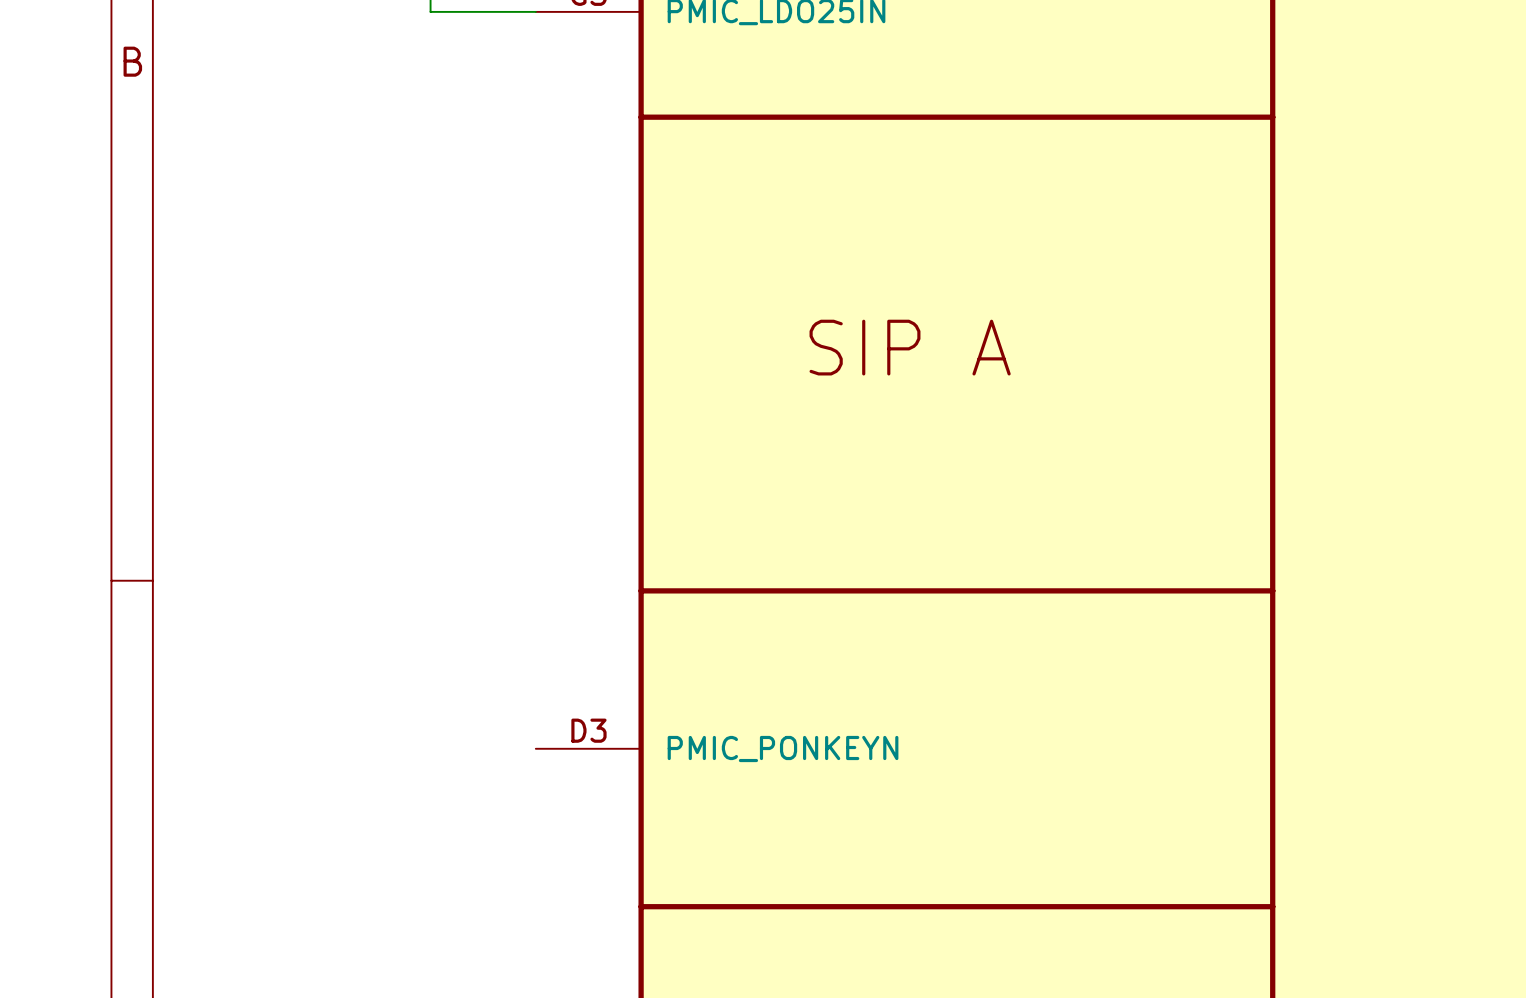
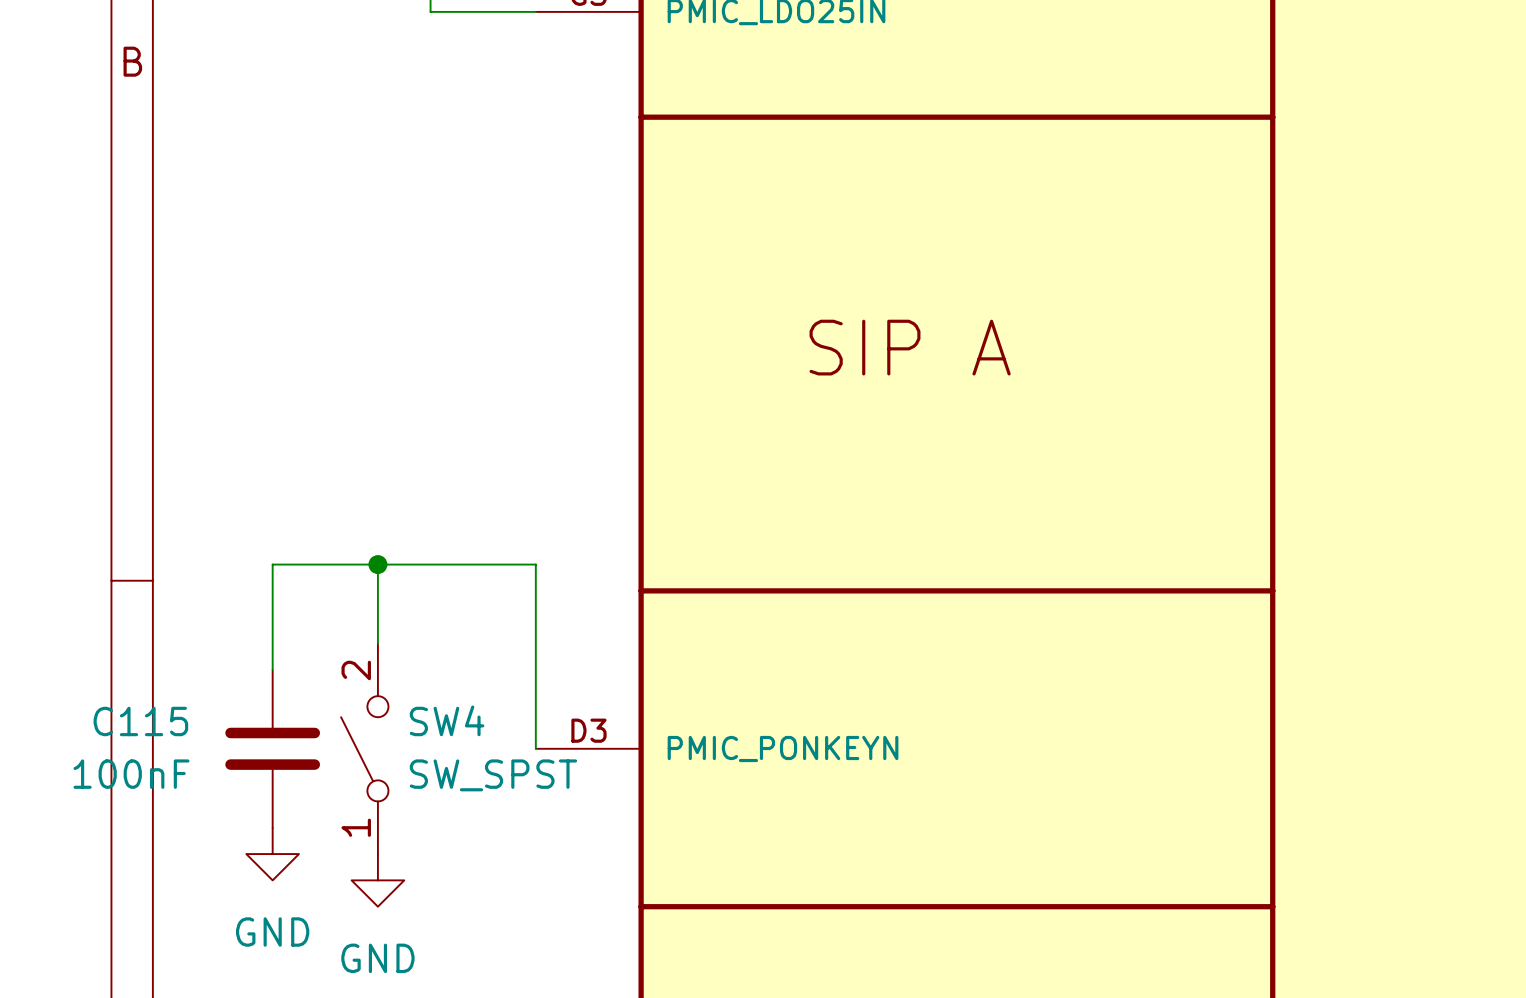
wire: none -> (377, 564) (377, 643)
junction: none -> (377, 564)
wire: none -> (272, 669) (272, 564) (535, 564) (535, 748)
C115: none -> 100nF (272, 748)
SW4: none -> SW_SPST (364, 748)
power symbol: none -> GND (272, 854)
power symbol: none -> GND (377, 880)

